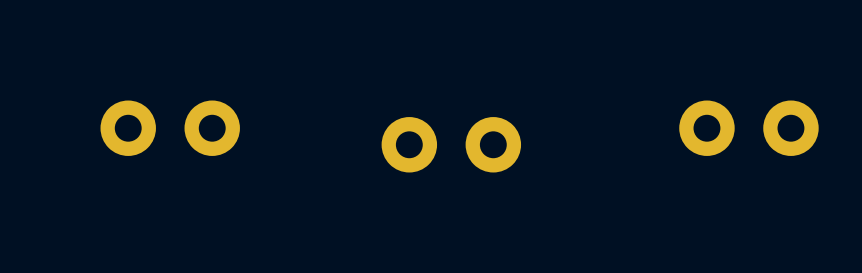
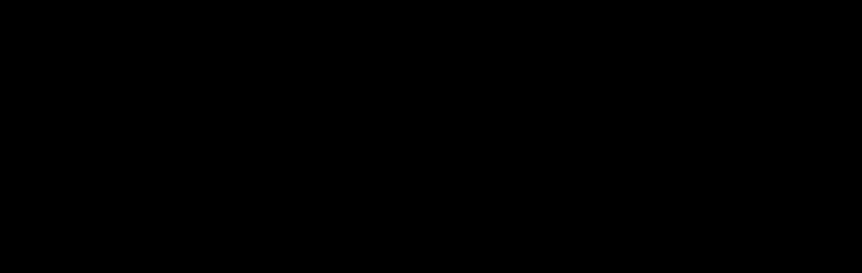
part: (170, 128) -> none
part: (748, 128) -> none
part: (451, 144) -> none

